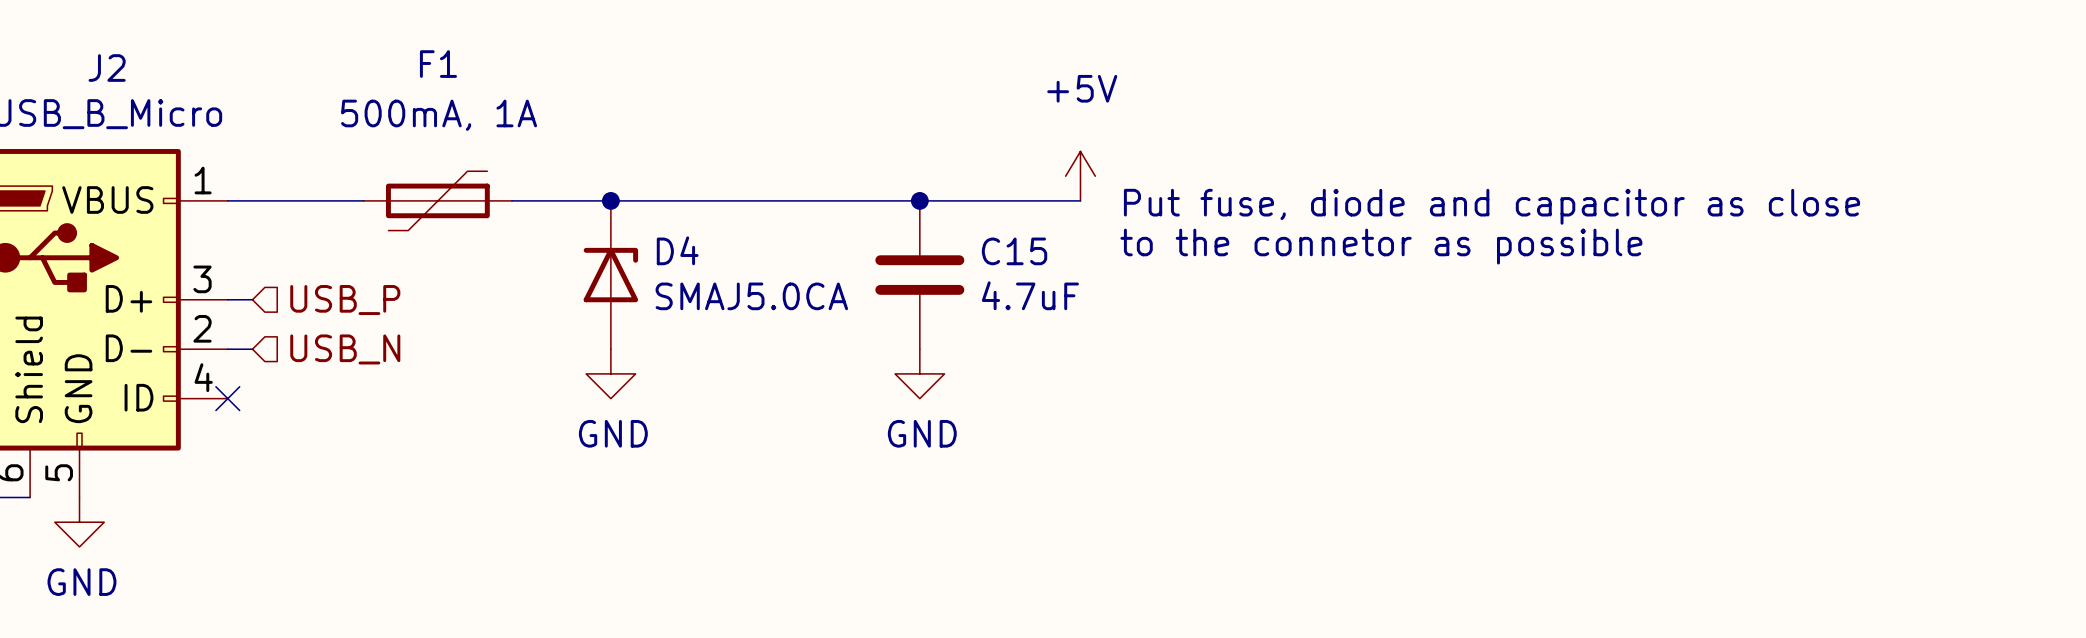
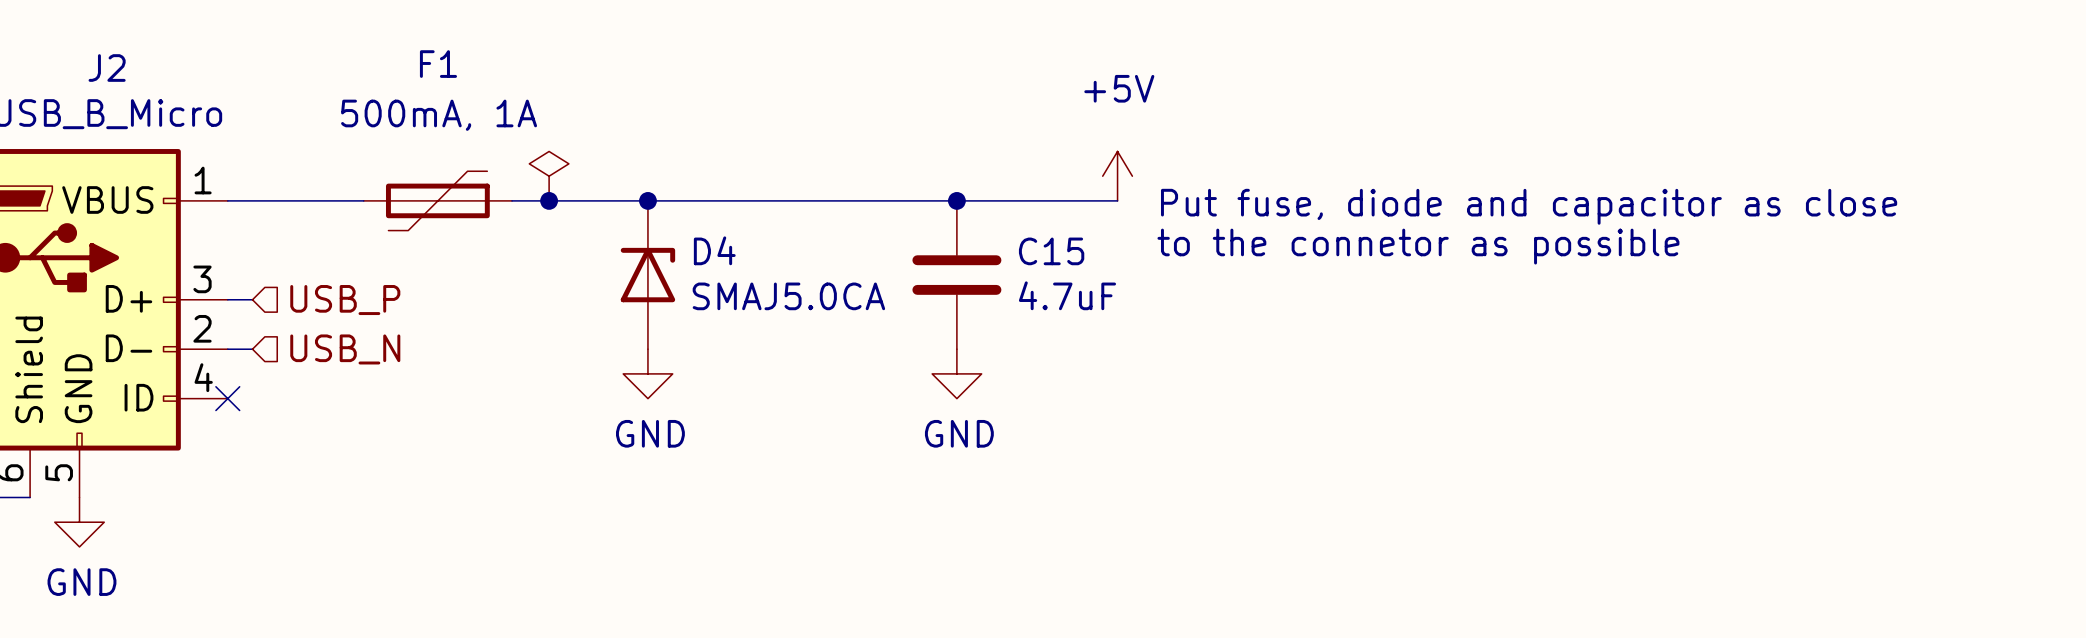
power symbol: none -> (549, 176)
power symbol position: +5V (1080, 176) -> +5V (1117, 176)
junction: none -> (549, 200)
junction: (610, 200) -> none
junction: none -> (647, 200)
junction position: (919, 200) -> (956, 200)
wire: none -> (1080, 200) (1117, 200)
text position: Put fuse, diode and capacitor as close (1492, 206) -> Put fuse, diode and capacitor as close (1529, 206)
text position: to the connetor as possible (1381, 246) -> to the connetor as possible (1418, 246)
D4 position: (610, 275) -> (647, 275)
C15 position: (919, 275) -> (956, 275)
power symbol position: GND (610, 373) -> GND (647, 373)
power symbol position: GND (919, 373) -> GND (956, 373)

